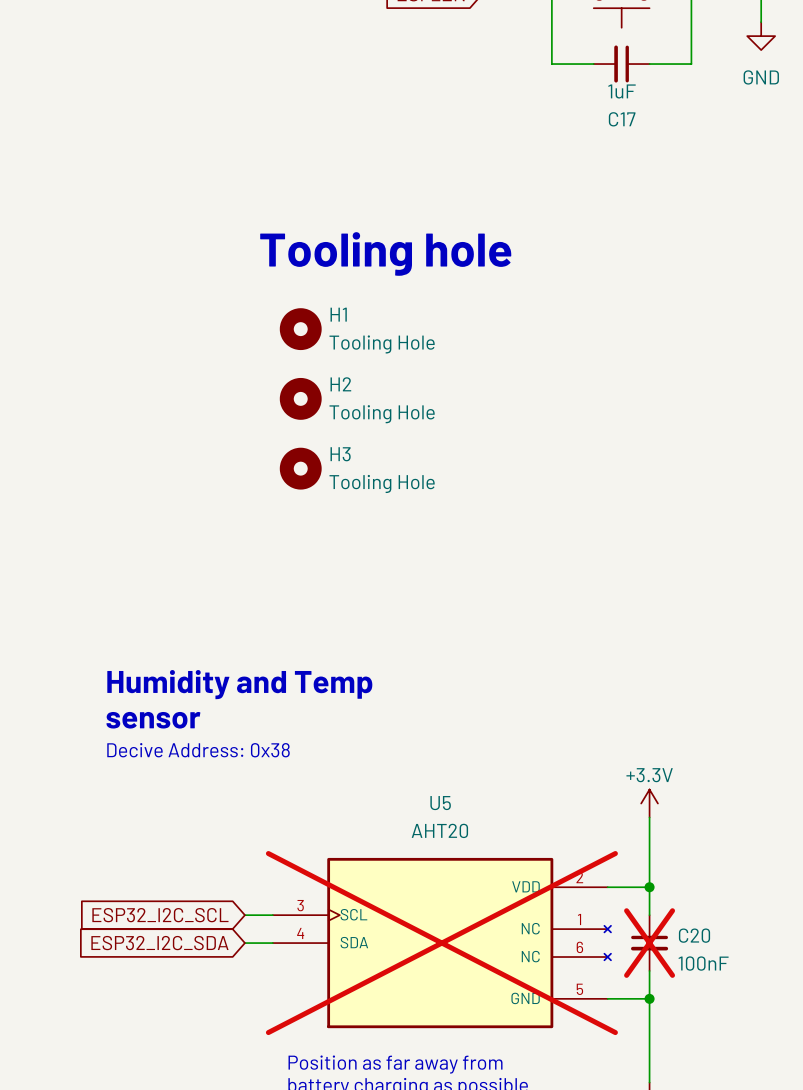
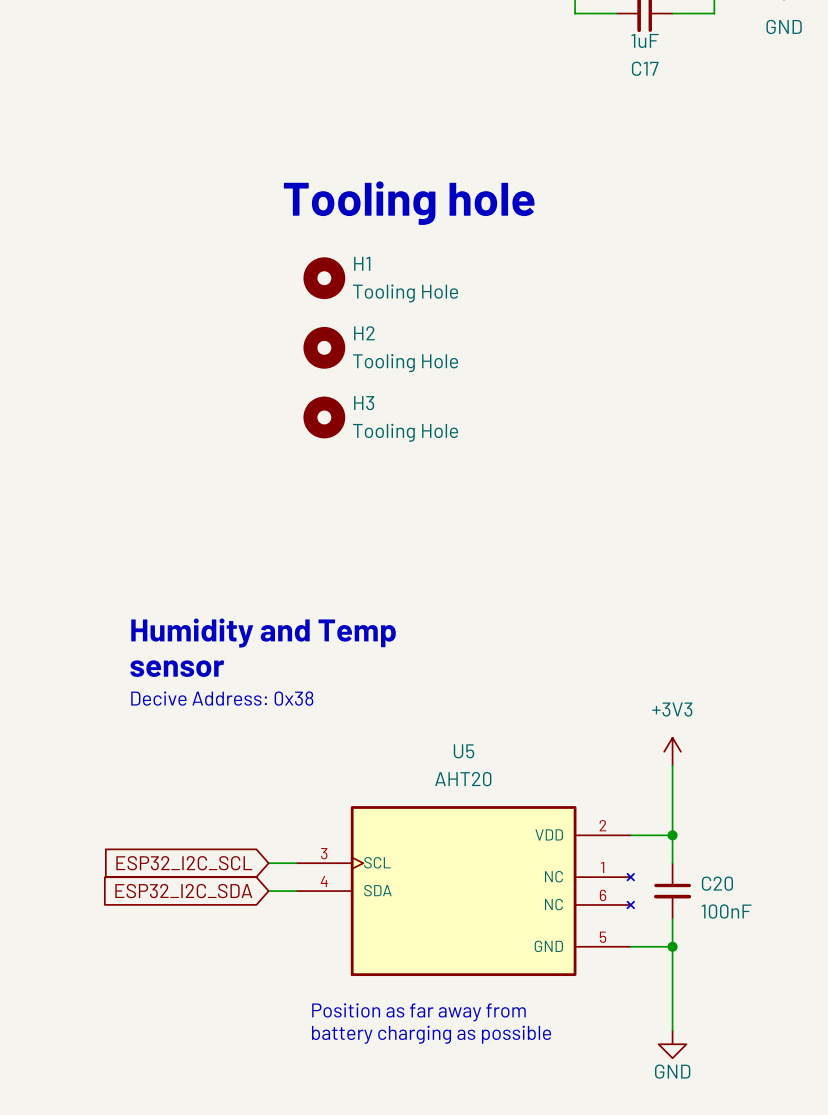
power symbol: +3.3V (649, 803) -> +3V3 (672, 751)
U5 do-not-place cross: (441, 943) -> none
C20 do-not-place cross: (649, 943) -> none

